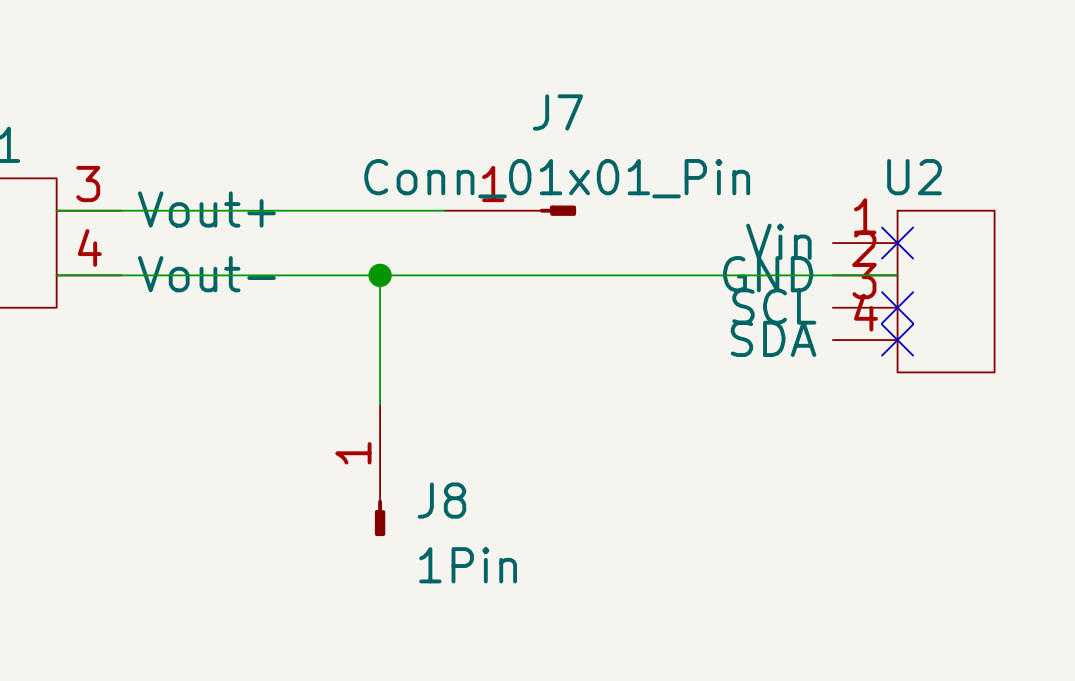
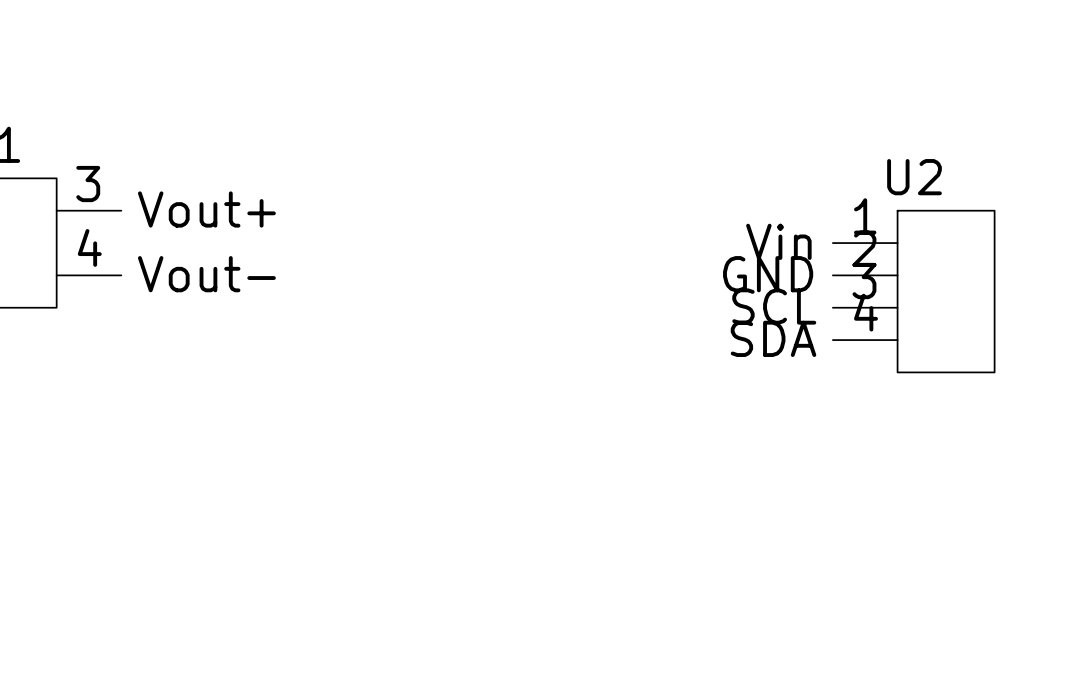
wire: (56, 210) (444, 210) -> none
J7: Conn_01x01_Pin (510, 210) -> none
no-connect mark: (897, 243) -> none
wire: (56, 275) (897, 275) -> none
wire: (380, 275) (380, 404) -> none
junction: (380, 275) -> none
no-connect mark: (897, 307) -> none
no-connect mark: (897, 340) -> none
J8: 1Pin (380, 470) -> none

